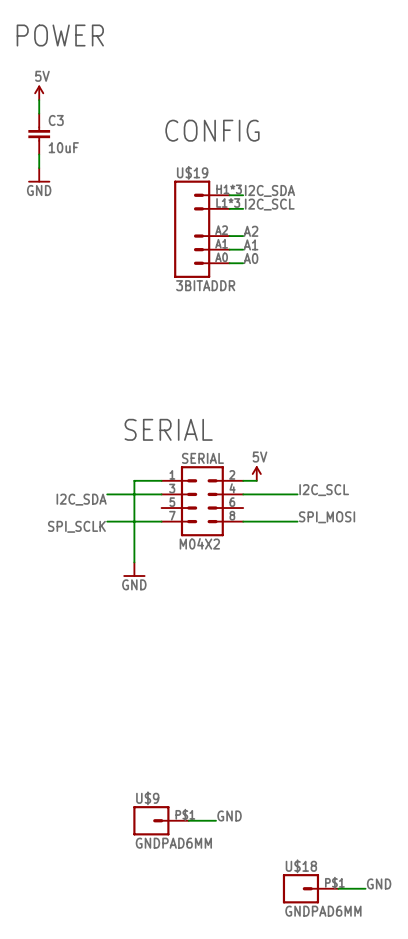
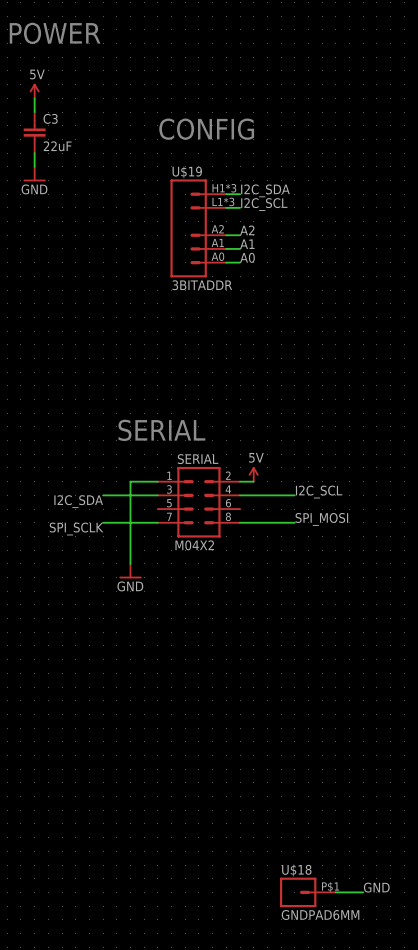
C3 value: 10uF (63, 147) -> 22uF (57, 146)
label: GND (229, 816) -> none
U$9: GNDPAD6MM (161, 820) -> none
wire: (188, 820) (215, 820) -> none

